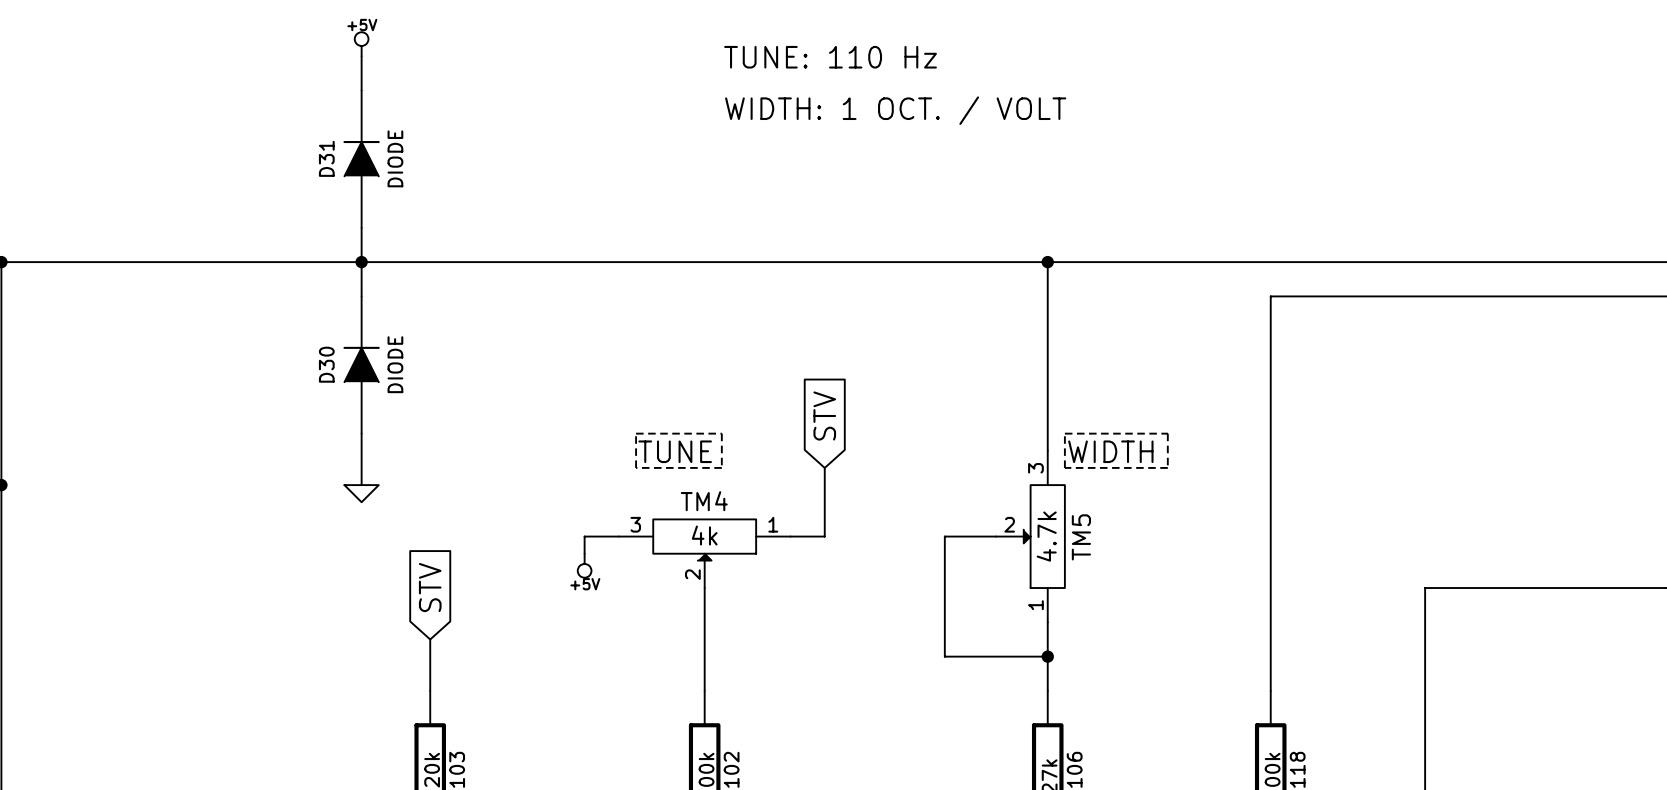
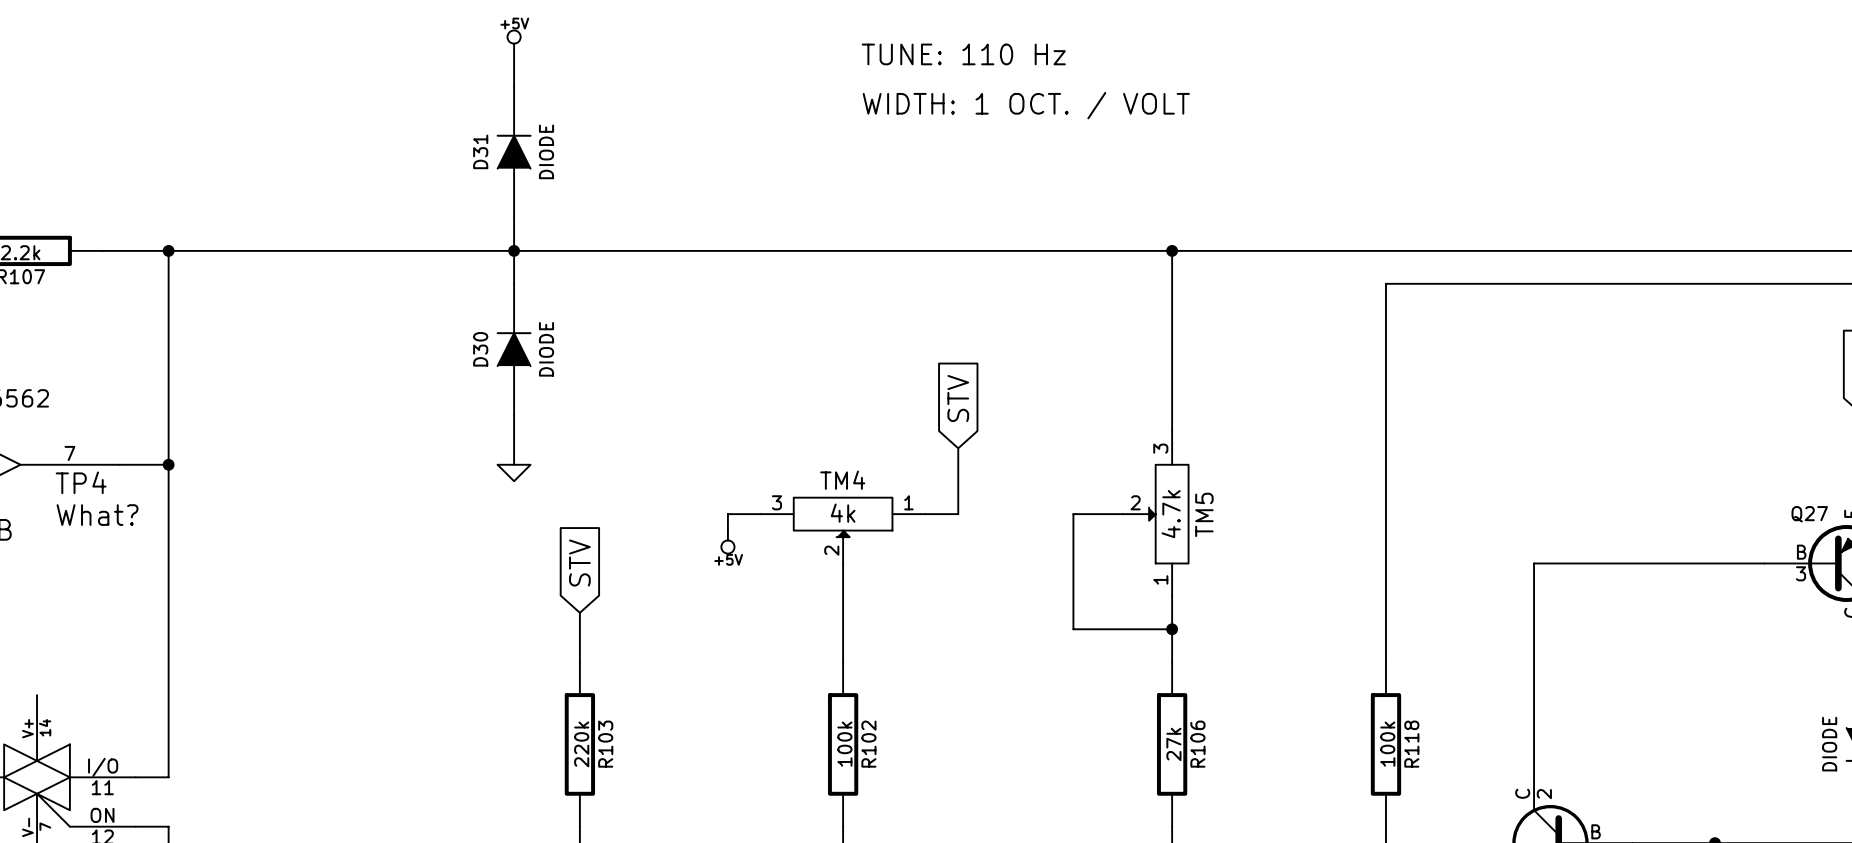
line: (636, 433) (721, 433) (721, 467) (636, 467) (636, 433) -> none
line: (1064, 433) (1167, 433) (1167, 467) (1064, 467) (1064, 433) -> none
text: TUNE (675, 451) -> none
text: WIDTH (1110, 451) -> none

